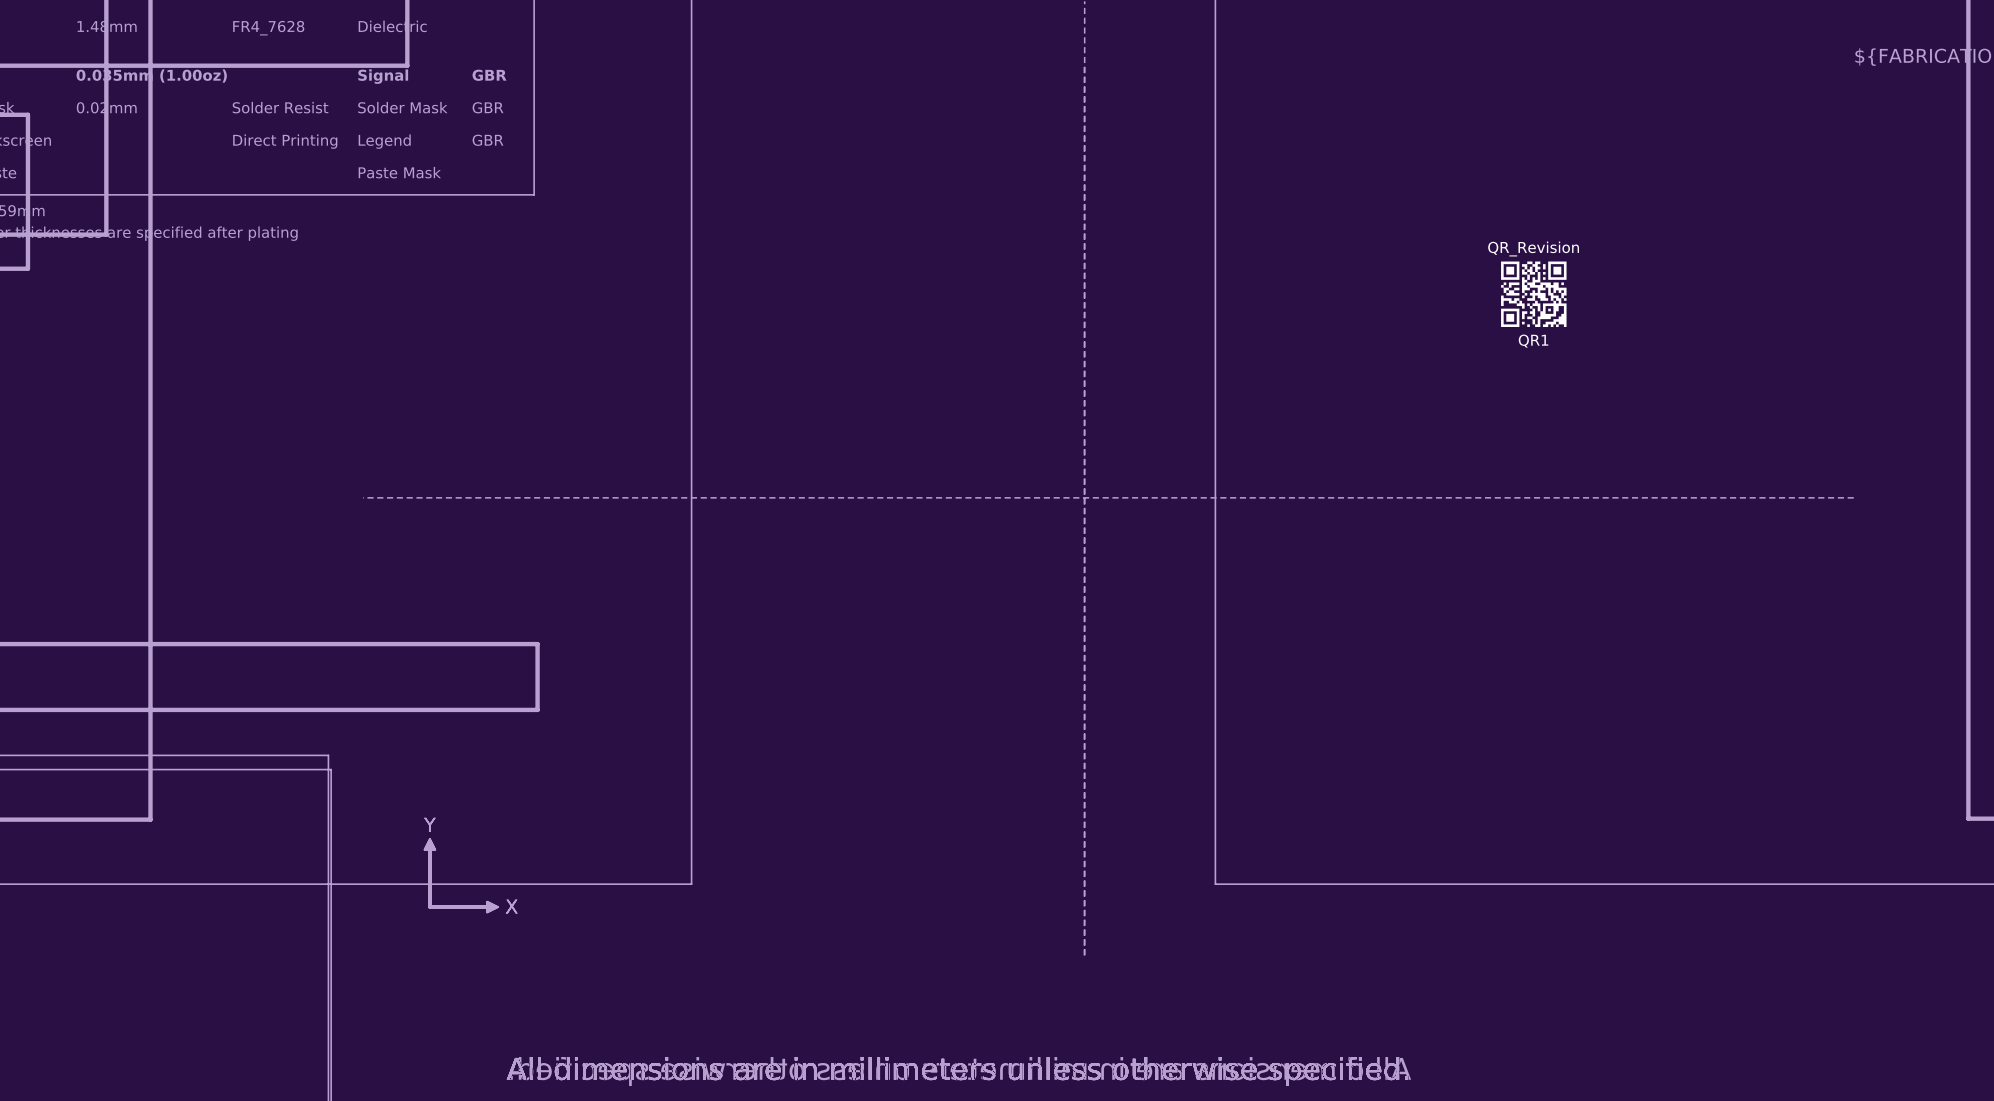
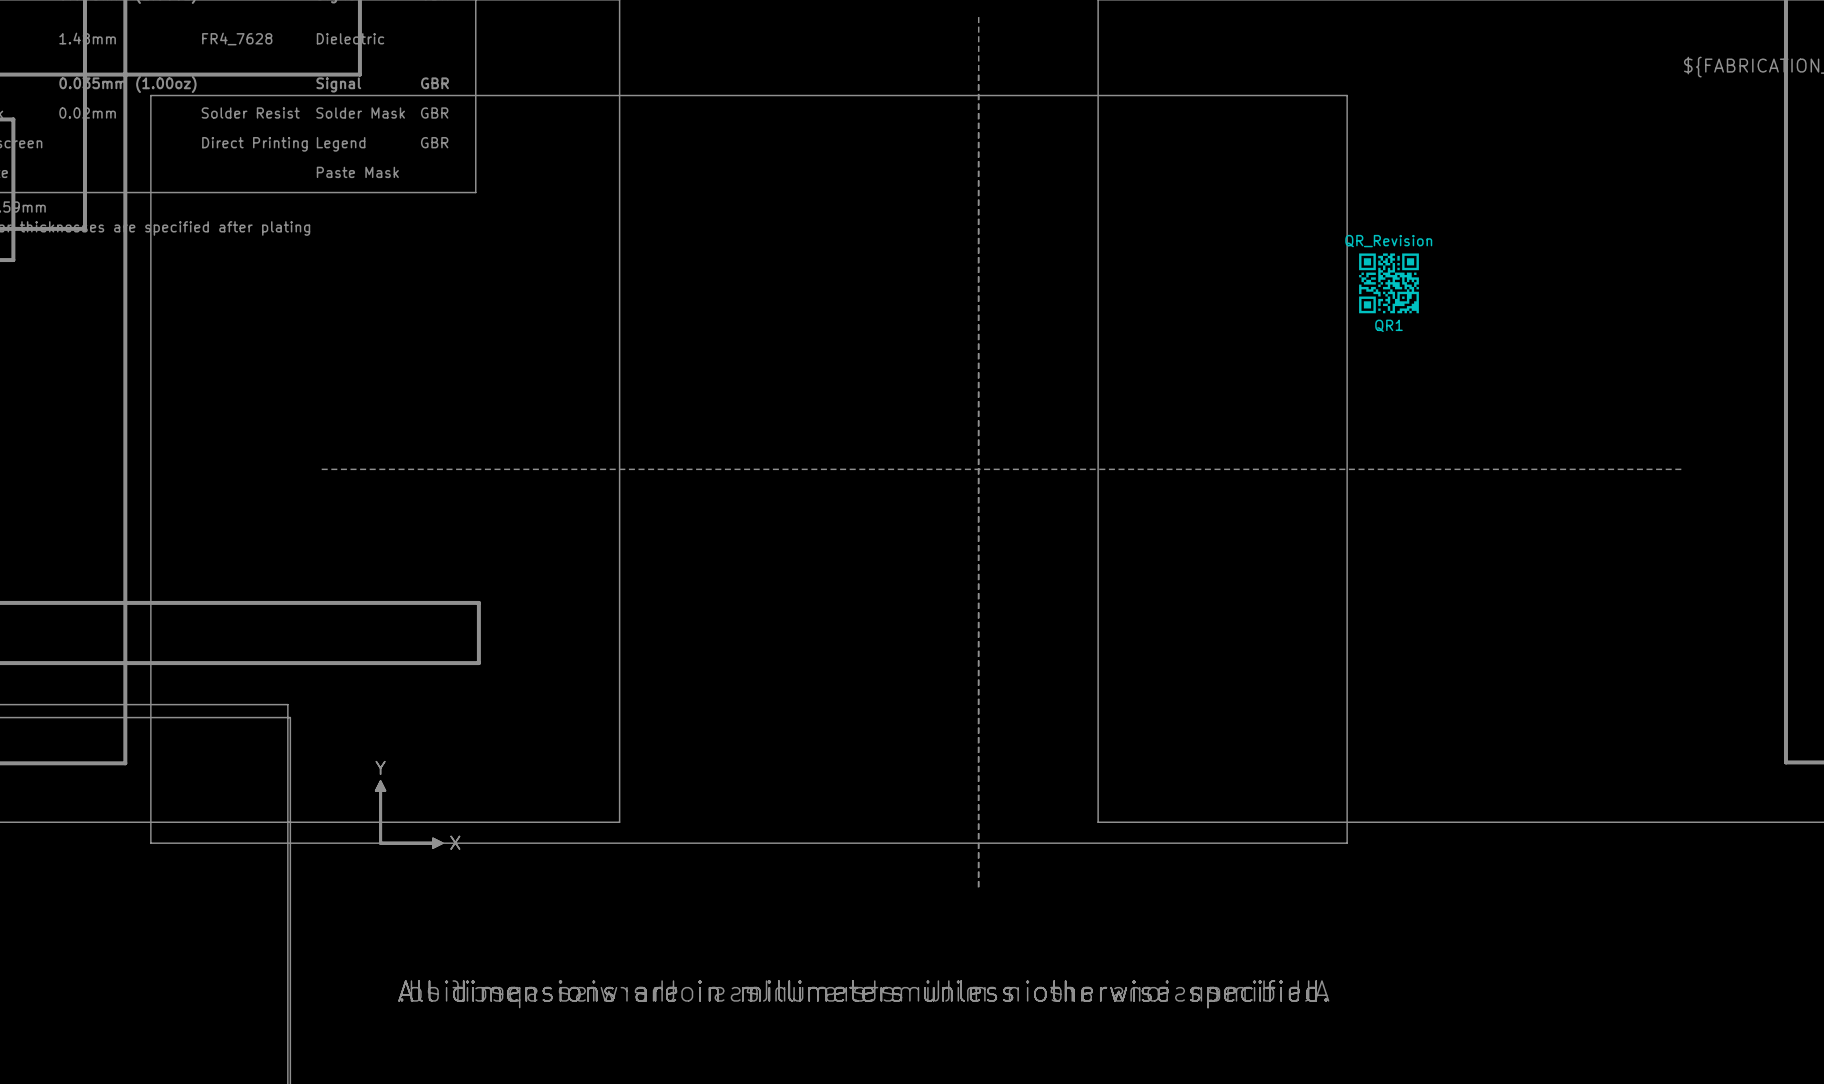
line: none -> (150, 95) (1347, 95) (1347, 843) (150, 843) (150, 95)

